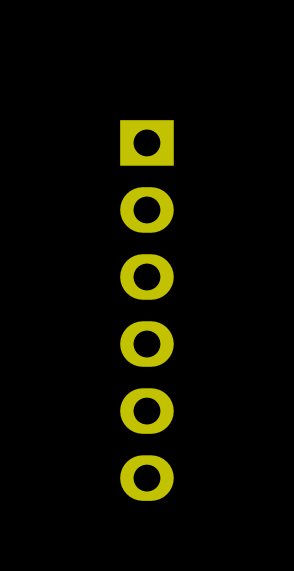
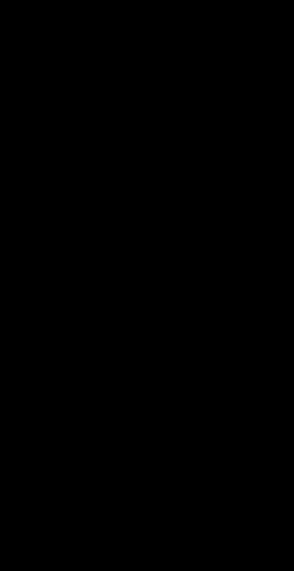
part: (146, 310) -> none

